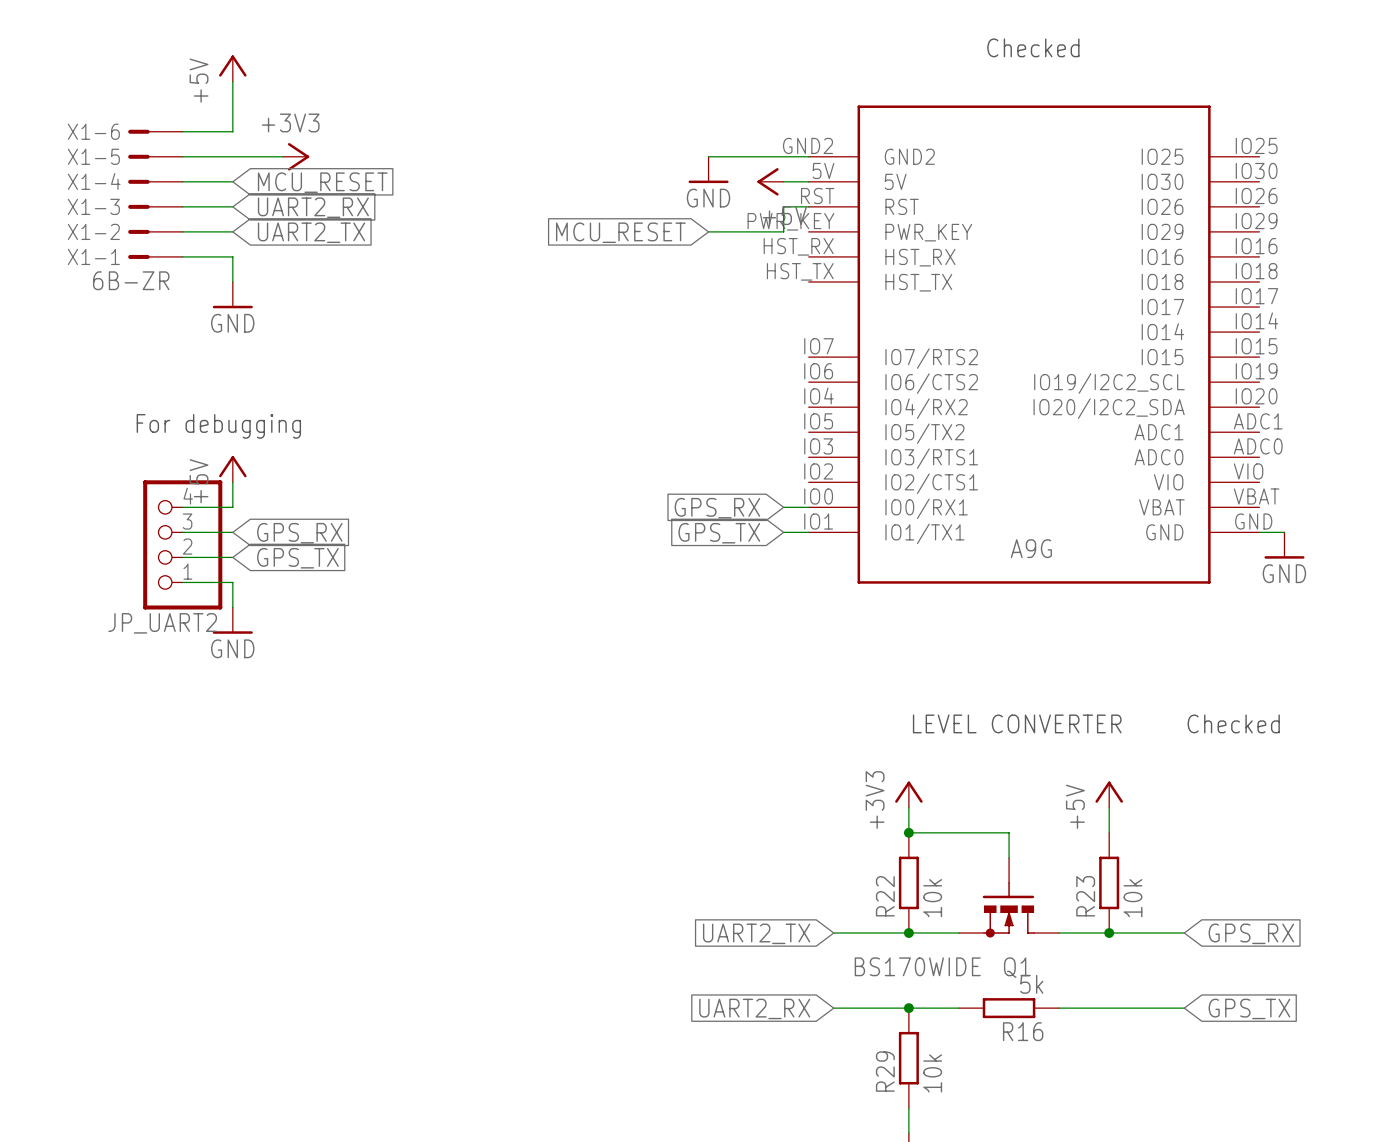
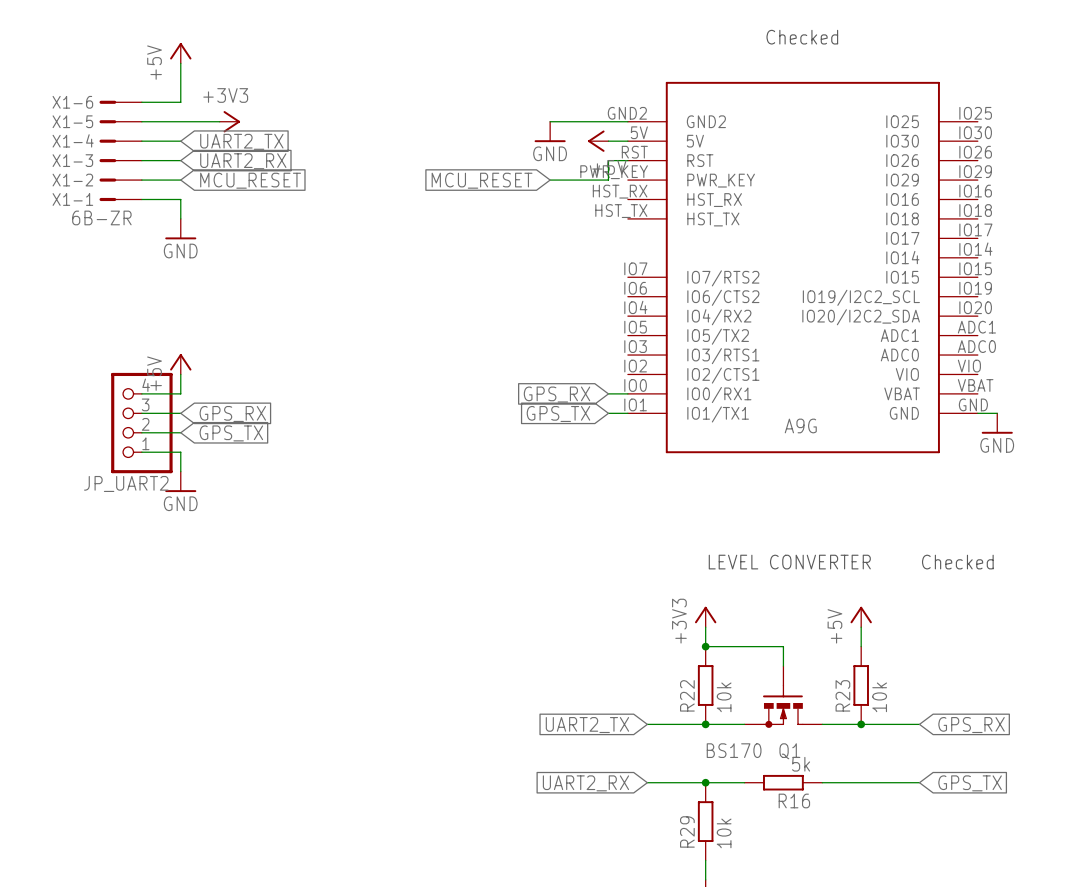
global label: MCU_RESET (322, 182) -> UART2_TX (241, 141)
global label: UART2_TX (311, 232) -> MCU_RESET (250, 180)
text: For debugging (218, 426) -> none
Q1 value: BS170WIDE (917, 966) -> BS170 (734, 750)

